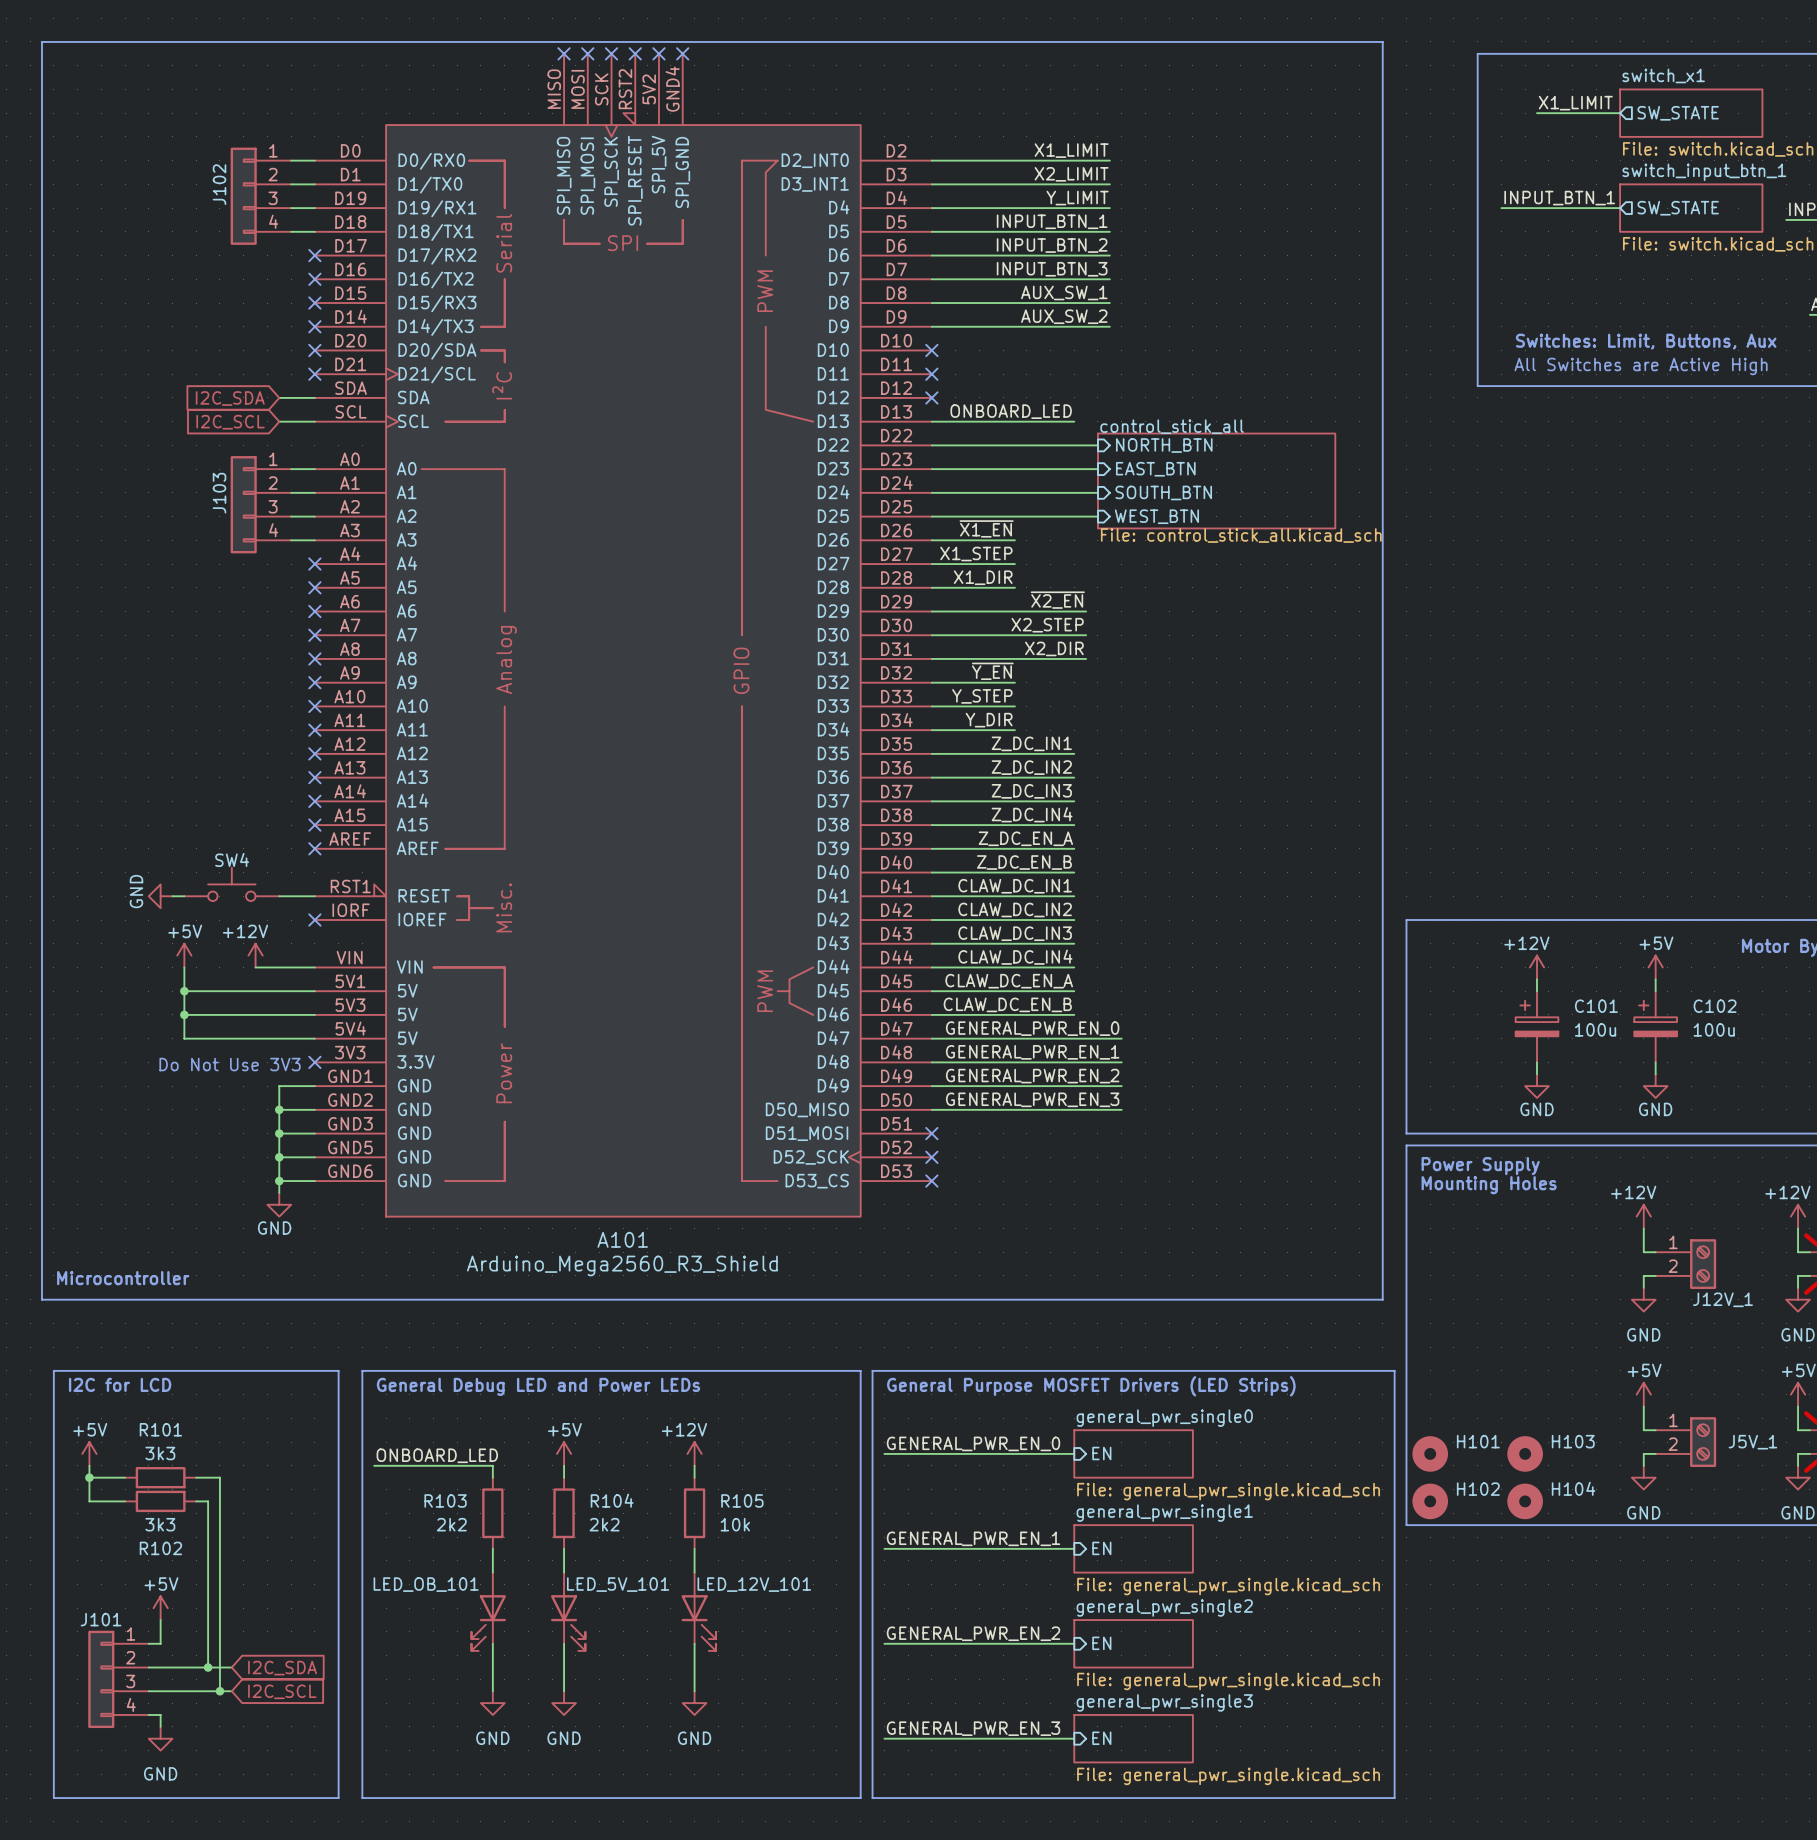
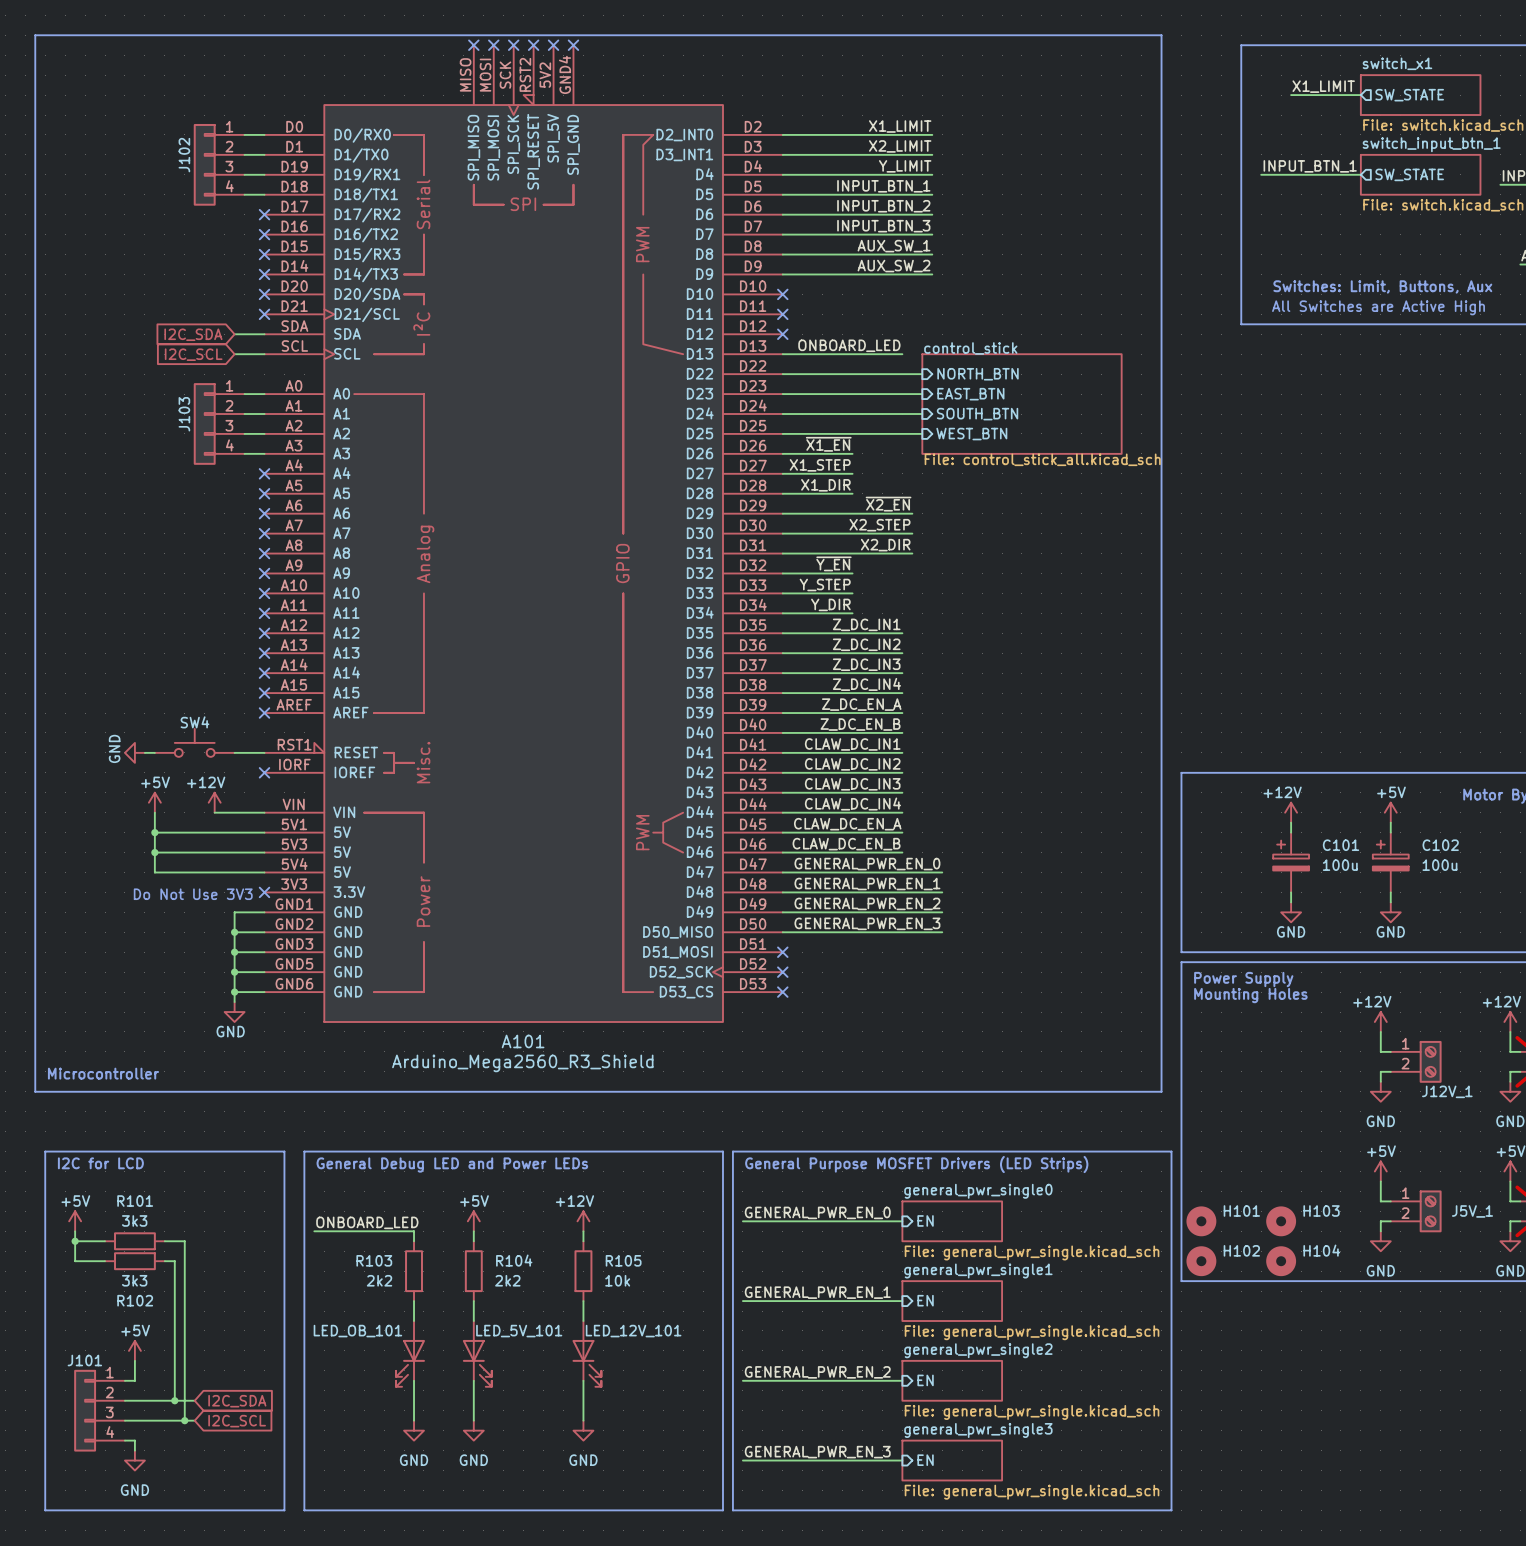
sheet control_stick_all: File: control_stick_all.kicad_sch (1216, 480) -> none
sheet control_stick: none -> File: control_stick_all.kicad_sch (1021, 404)

